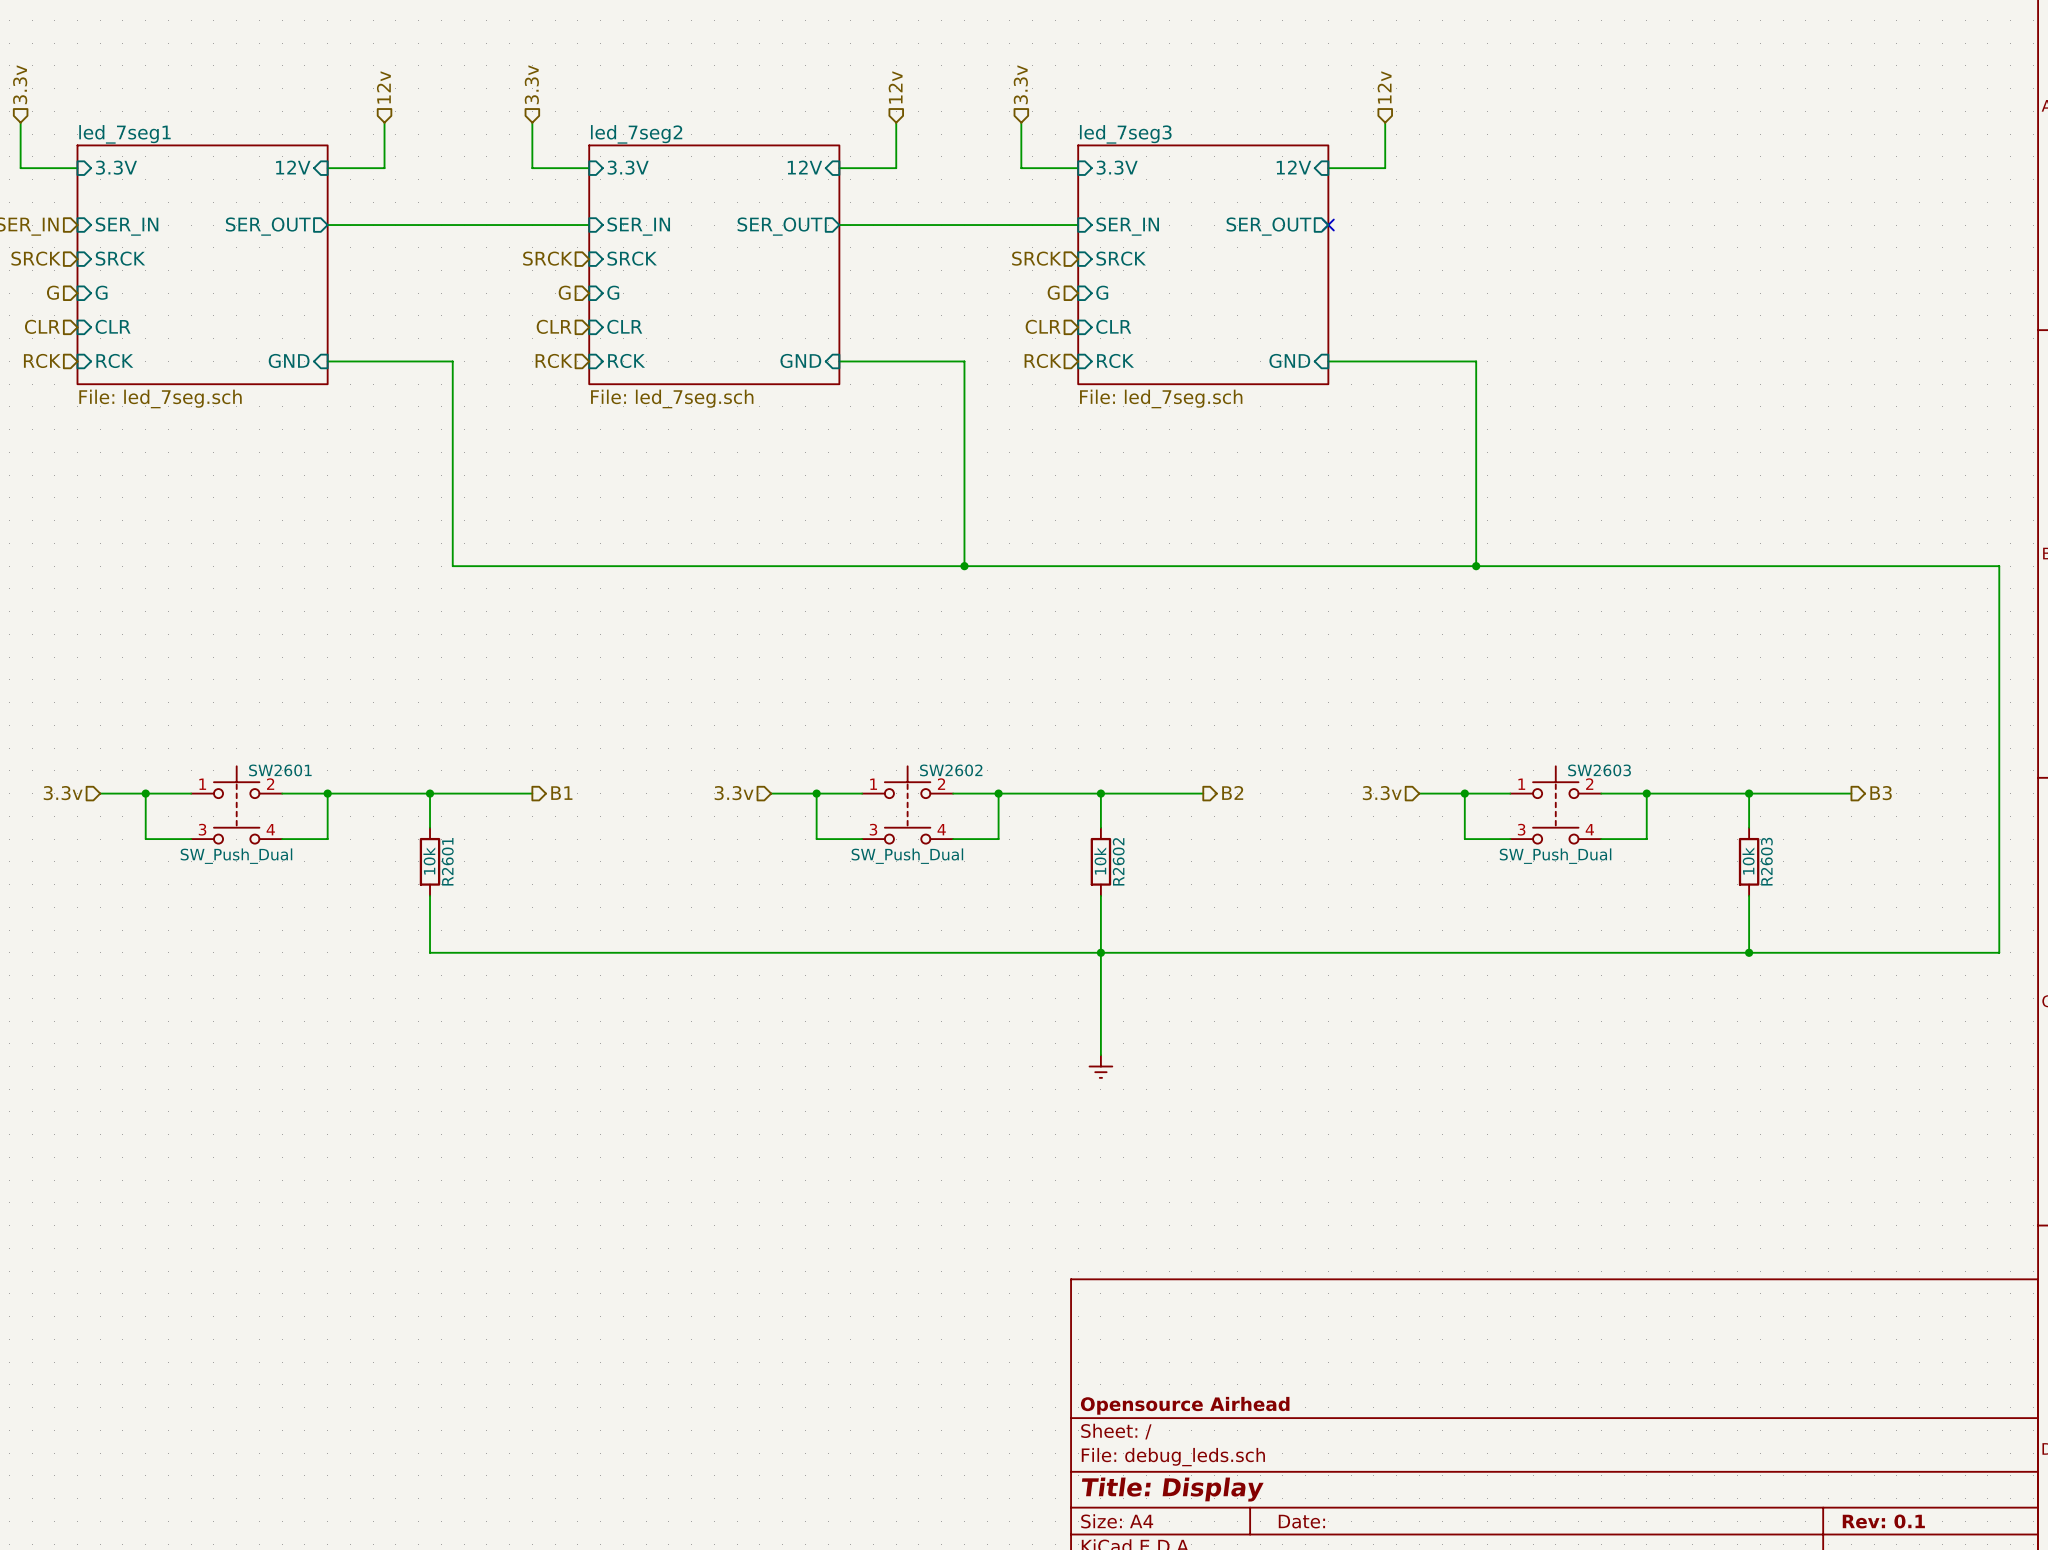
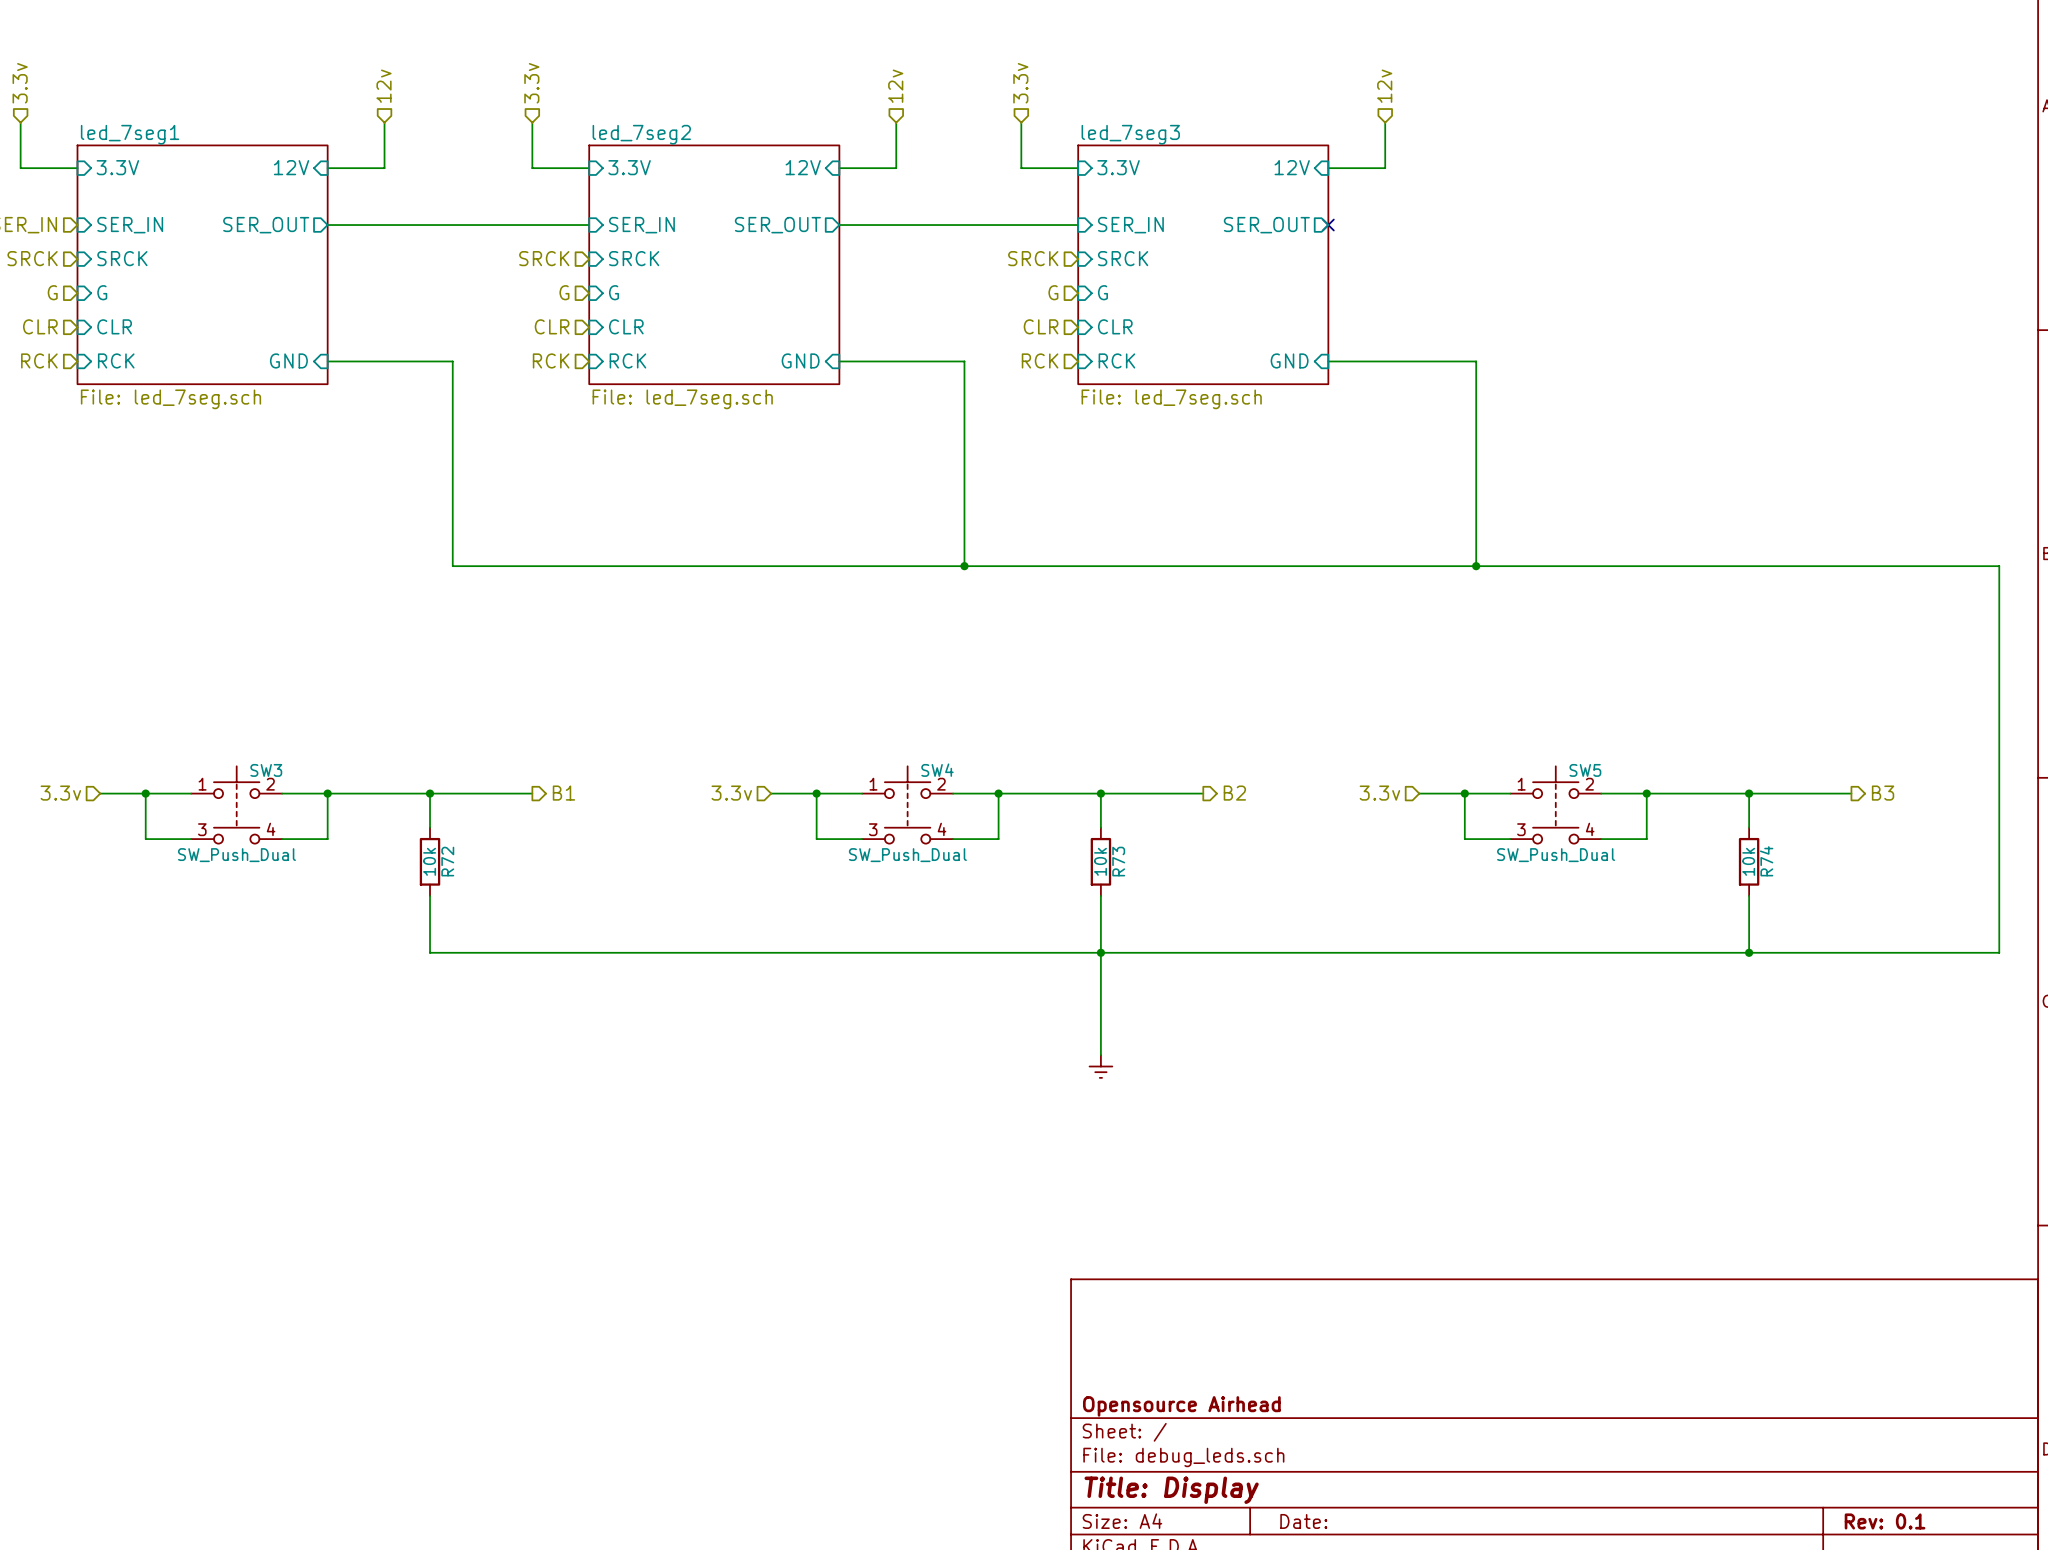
SW2601 name: SW2601 (280, 770) -> SW3 (266, 770)
SW2602 name: SW2602 (951, 770) -> SW4 (937, 770)
SW2603 name: SW2603 (1599, 770) -> SW5 (1585, 770)
R2601 name: R2601 (447, 861) -> R72 (447, 861)
R2602 name: R2602 (1118, 861) -> R73 (1118, 861)
R2603 name: R2603 (1766, 861) -> R74 (1766, 861)

